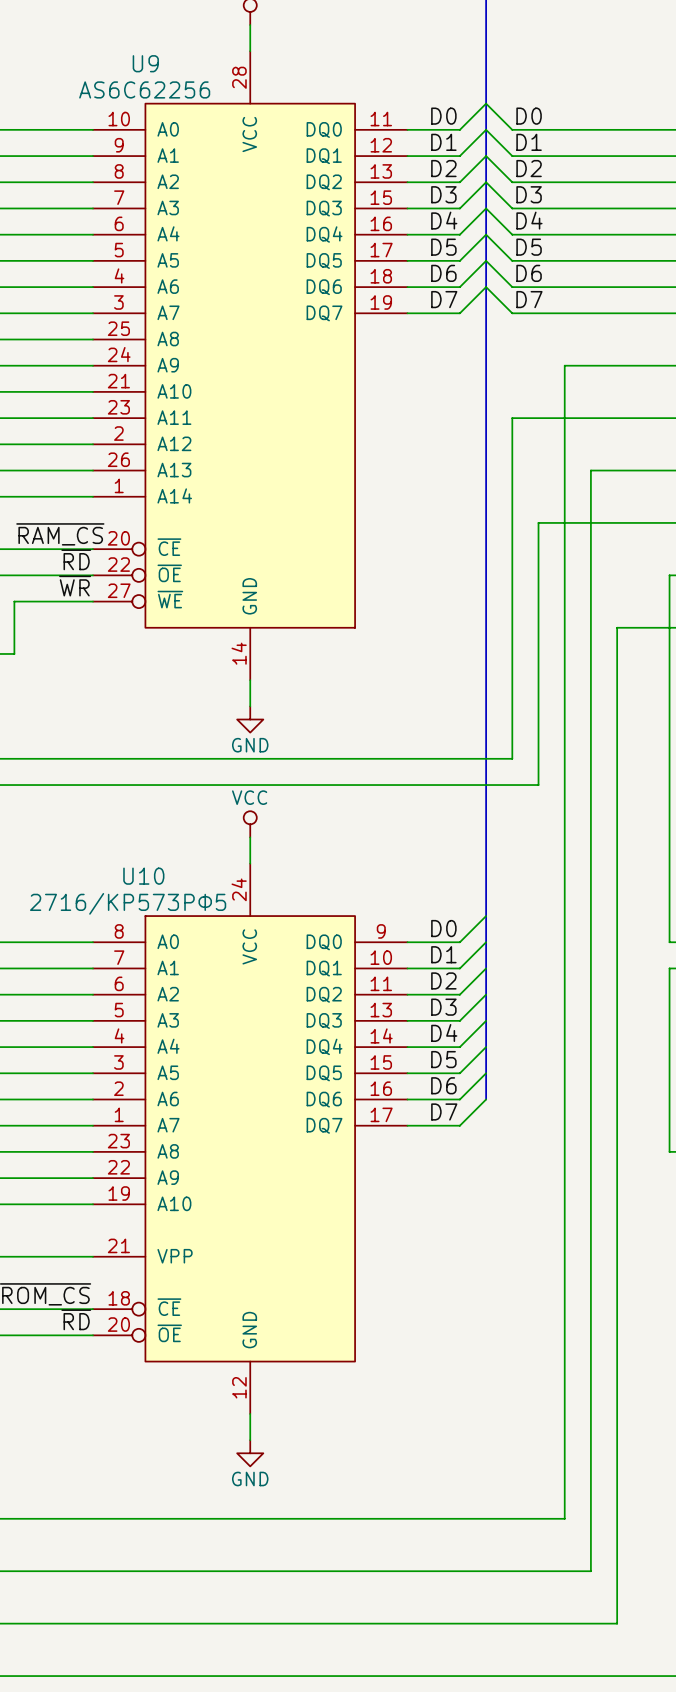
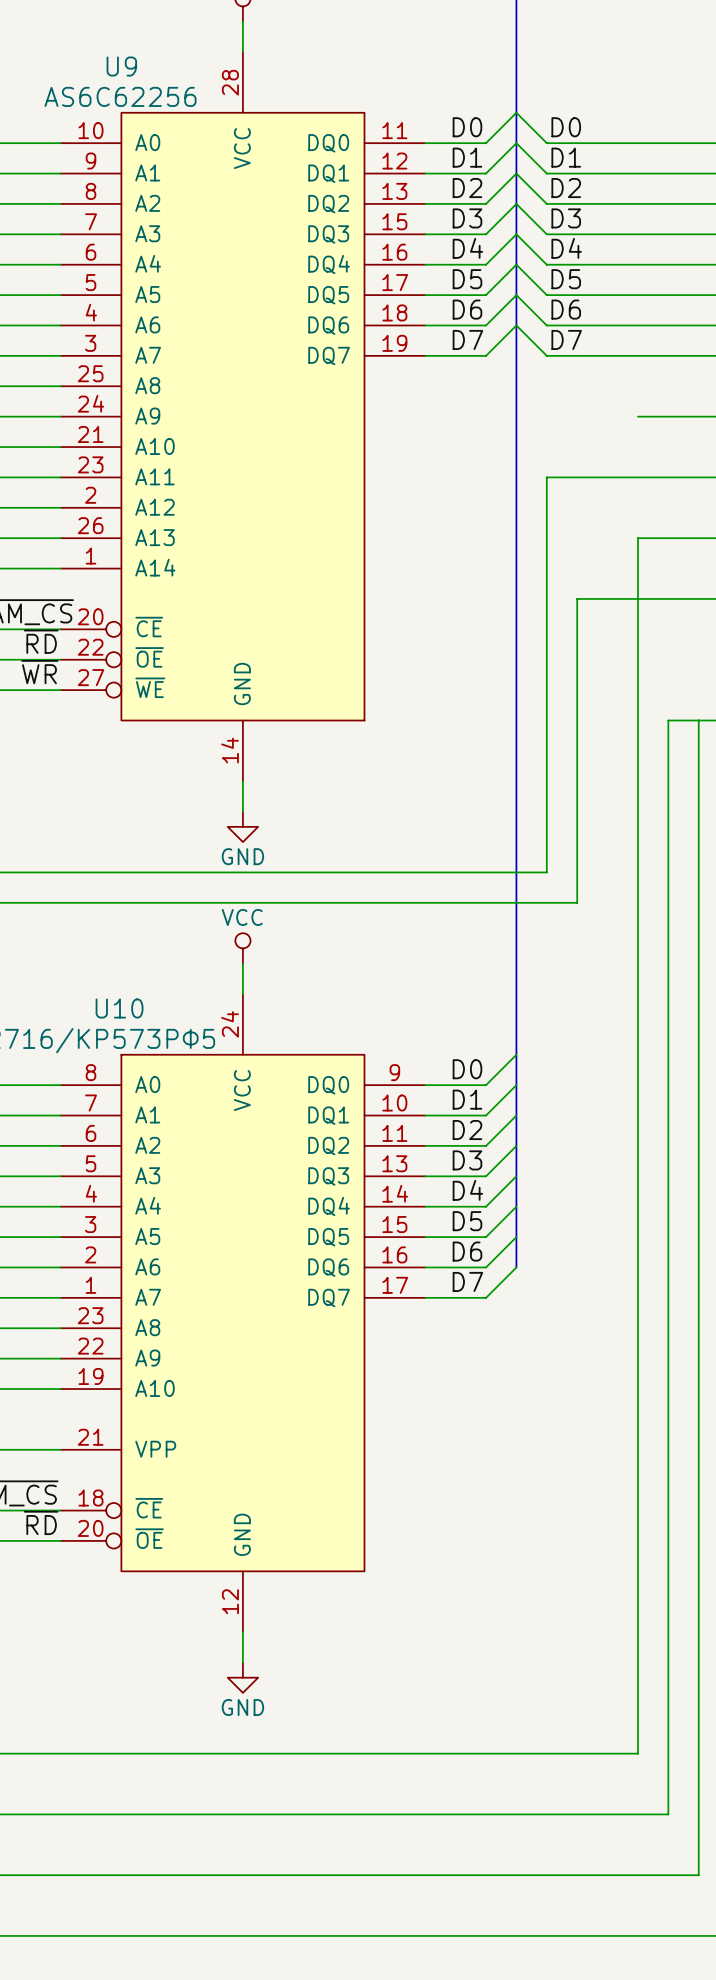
wire: (590, 365) (564, 365) (564, 1518) -> none
wire: none -> (698, 720) (698, 1875) (668, 1875)
wire: (590, 1518) (590, 1571) -> (637, 1753) (607, 1753)
wire: (617, 1571) (617, 1623) -> (668, 1814) (637, 1814)

